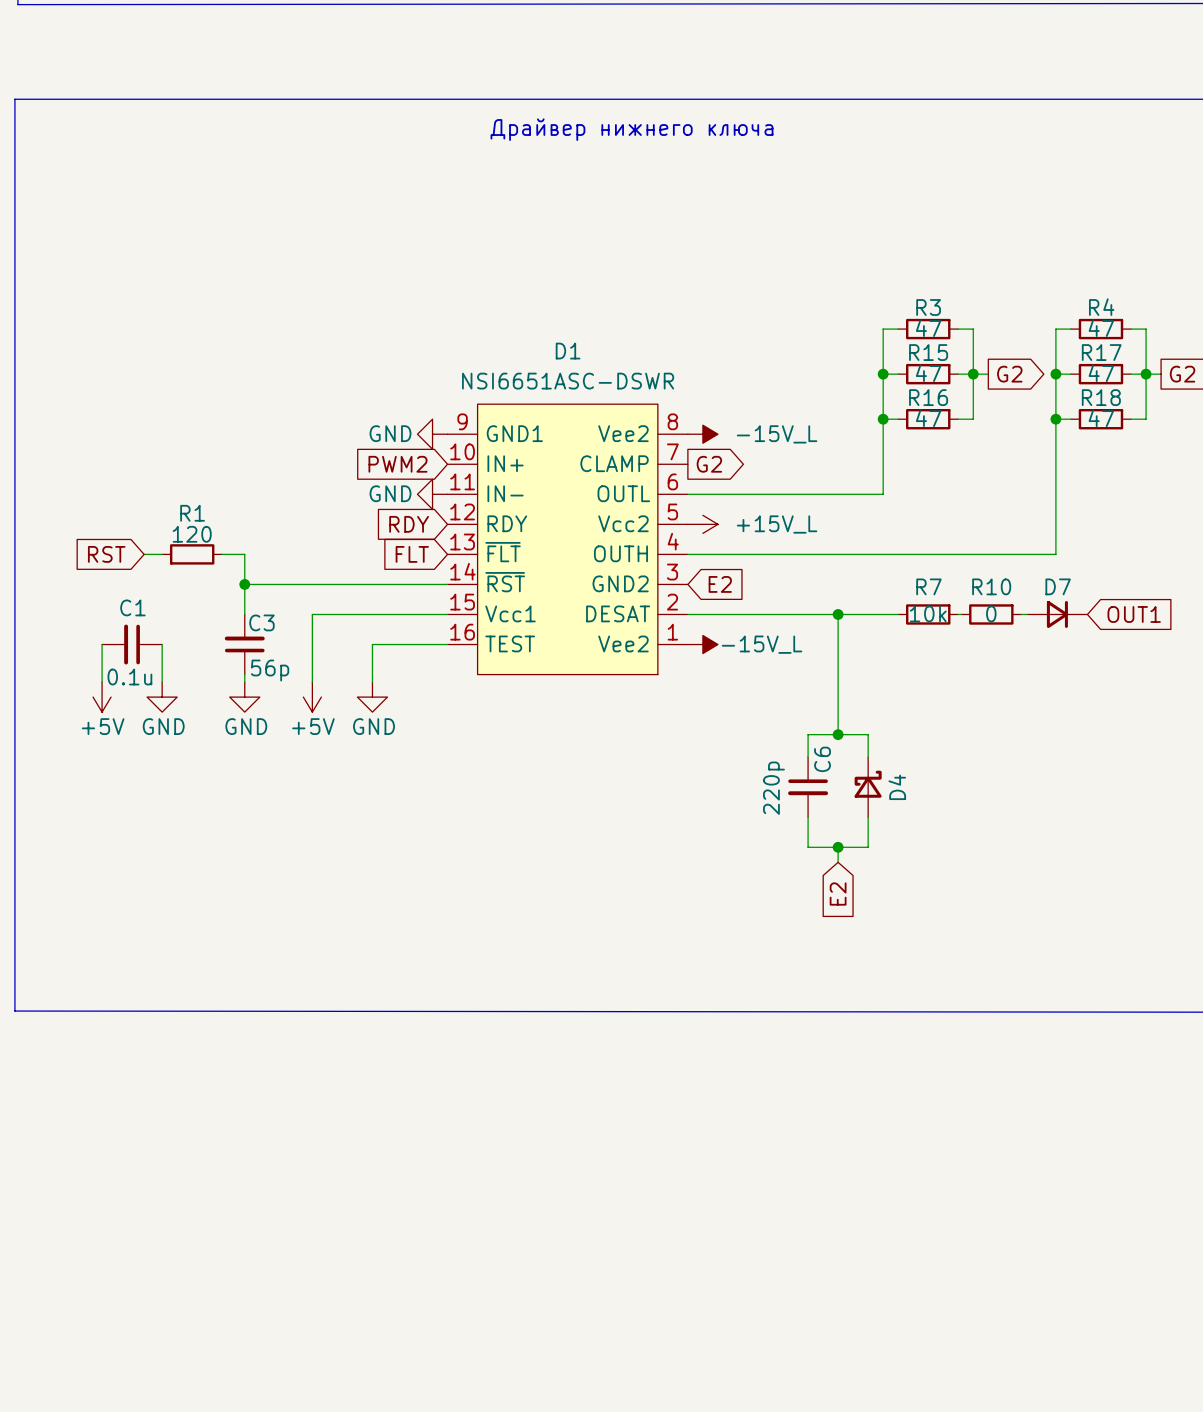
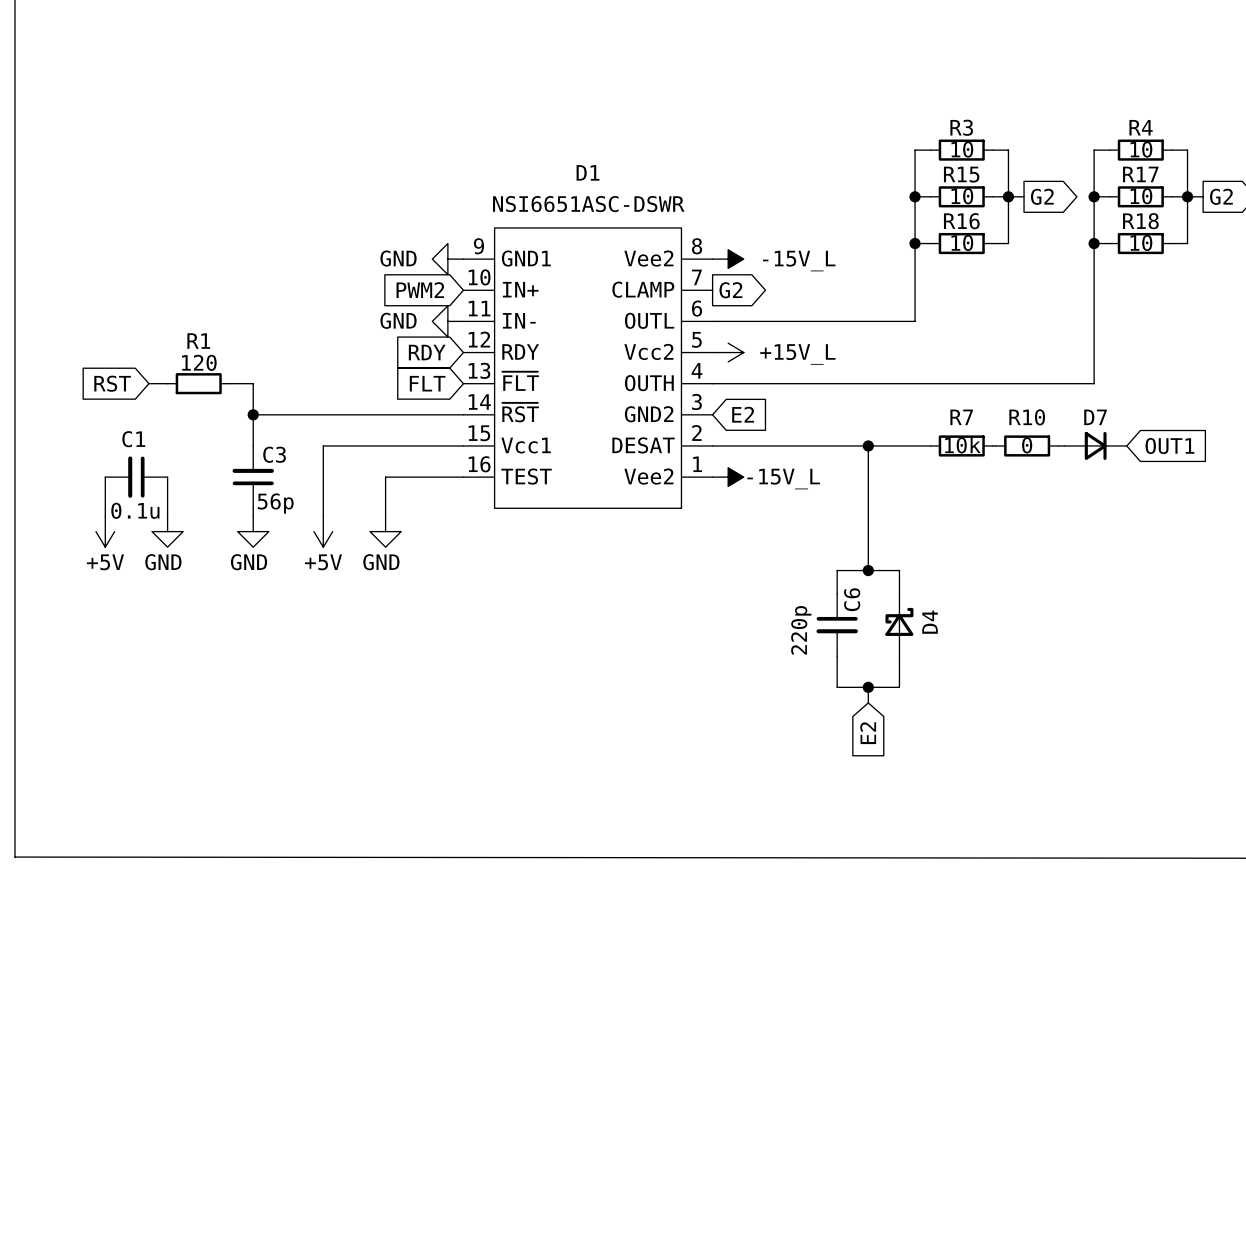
R3 value: 47 (928, 328) -> 10 (962, 149)
R4 value: 47 (1101, 328) -> 10 (1141, 149)
R15 value: 47 (928, 373) -> 10 (962, 196)
R17 value: 47 (1101, 373) -> 10 (1141, 196)
R16 value: 47 (928, 418) -> 10 (962, 242)
R18 value: 47 (1101, 418) -> 10 (1141, 242)

